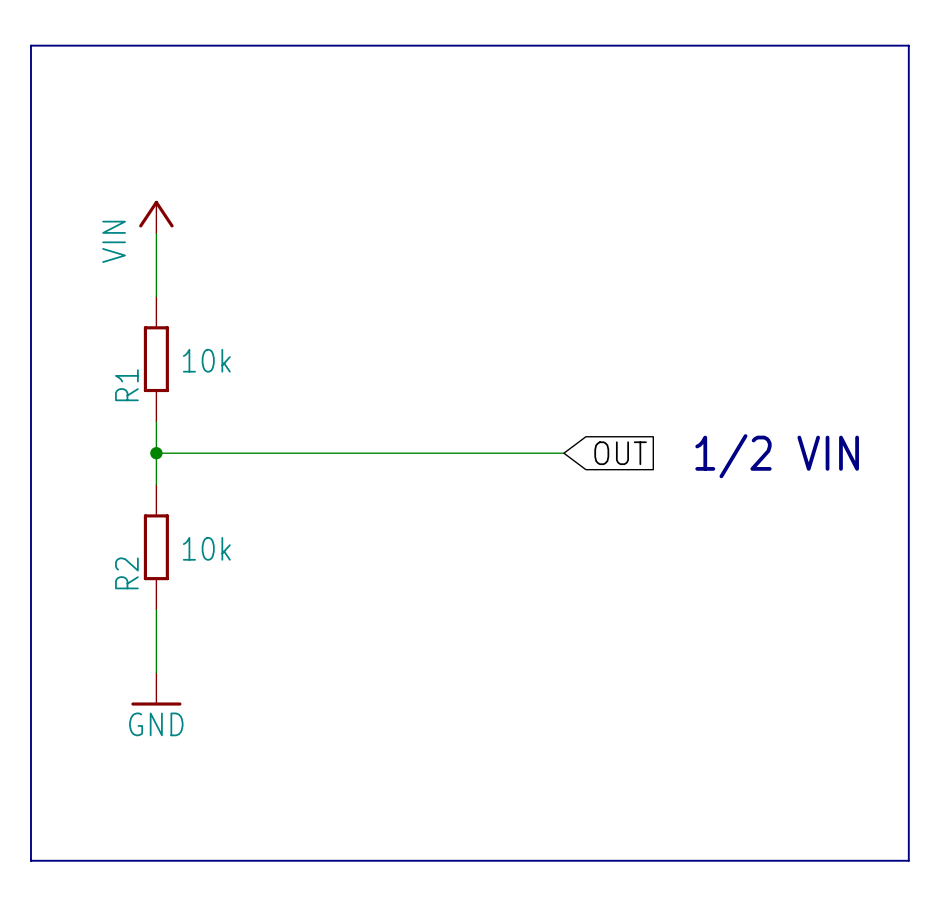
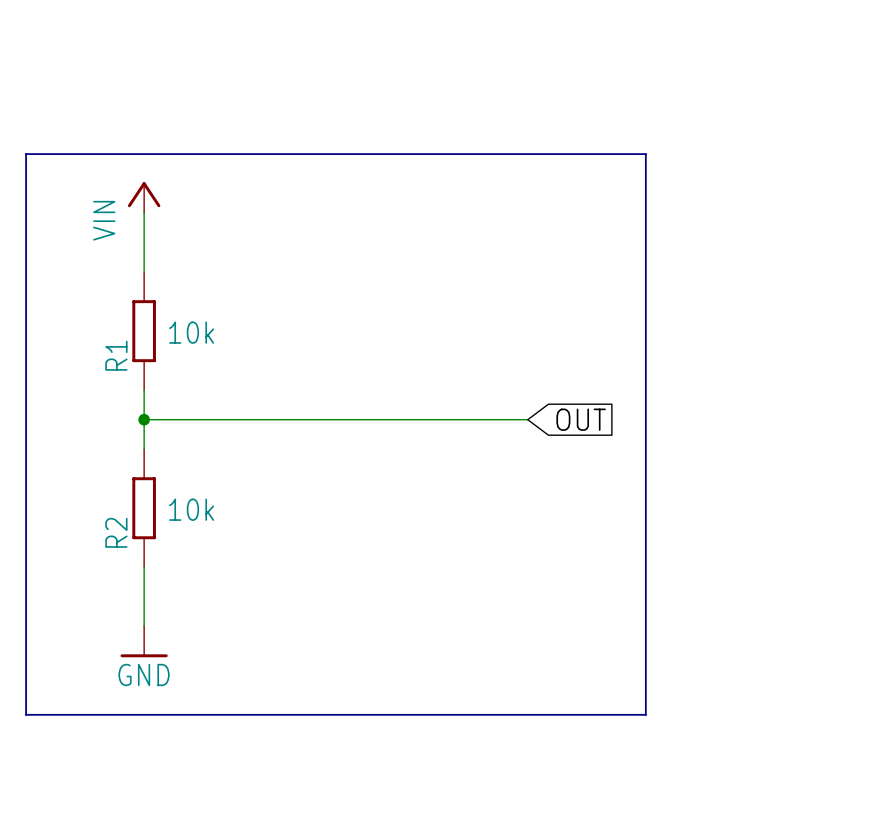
line: (30, 171) (30, 45) (908, 45) (908, 860) (30, 860) (30, 766) -> (26, 154) (645, 154) (645, 714) (26, 714)
text: 1/2 VIN (777, 456) -> none

